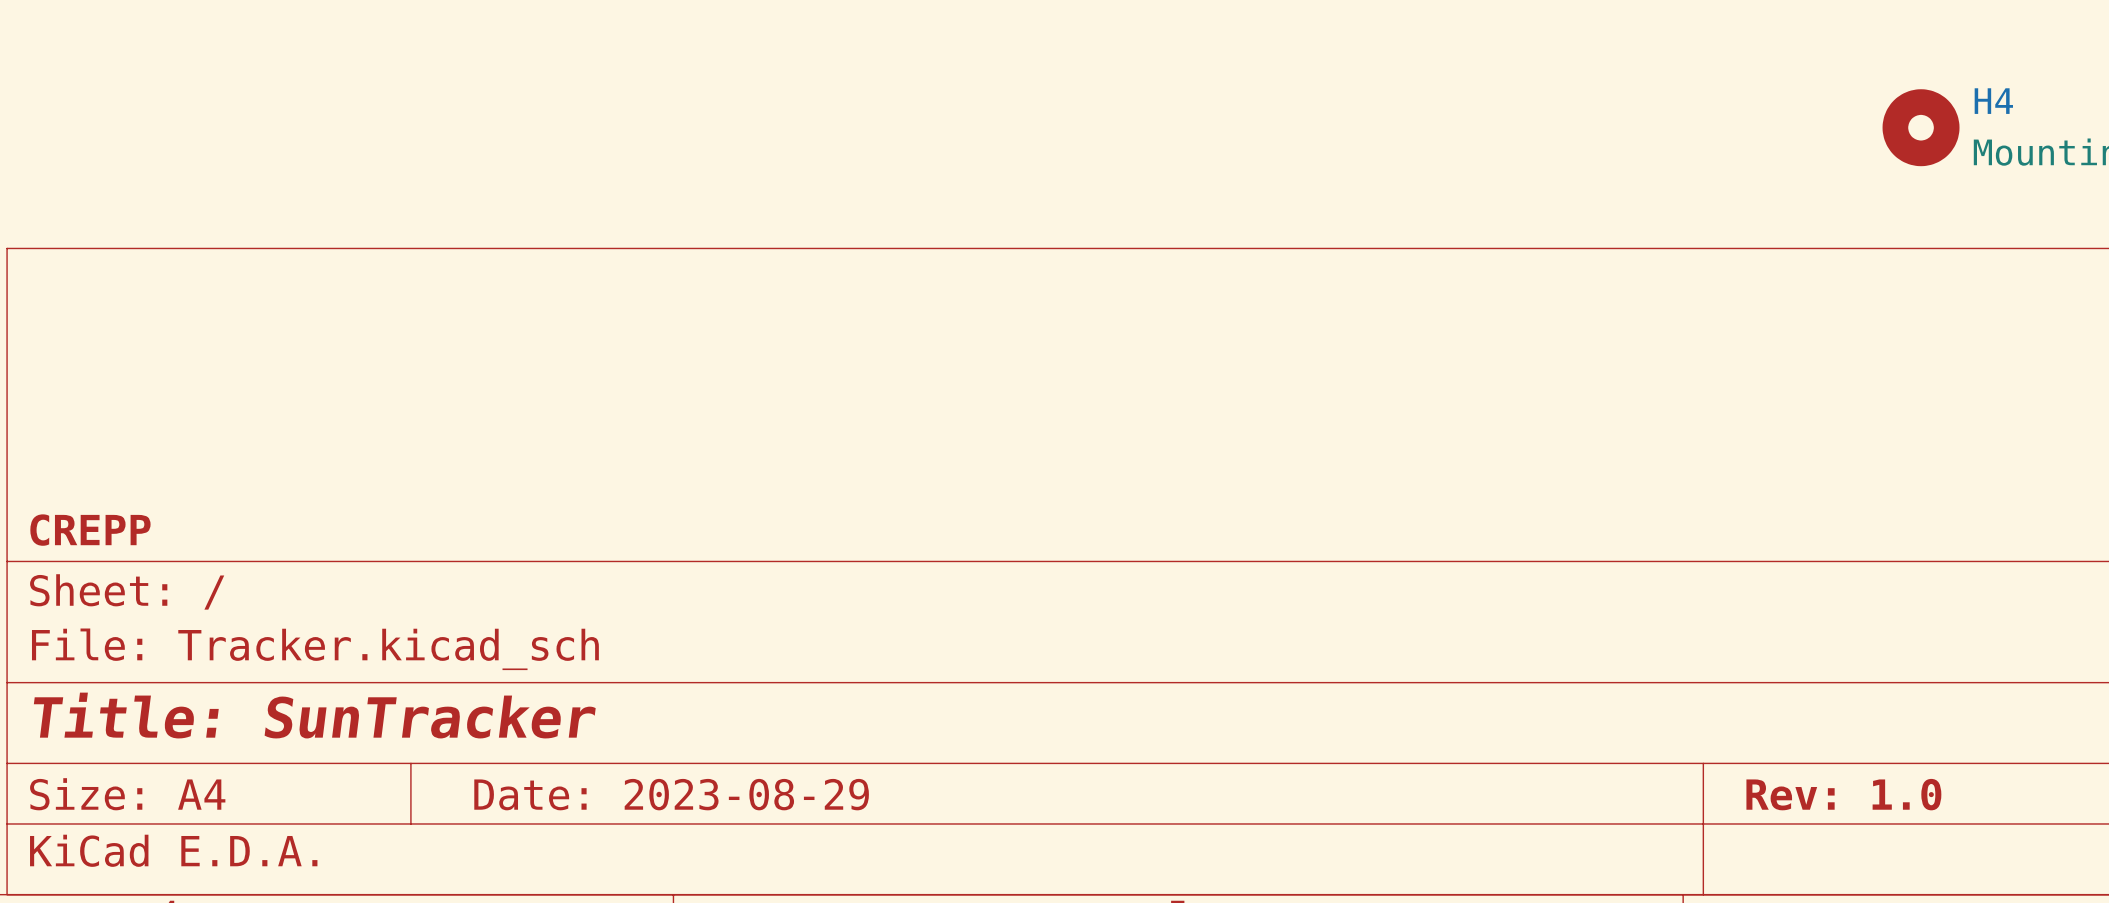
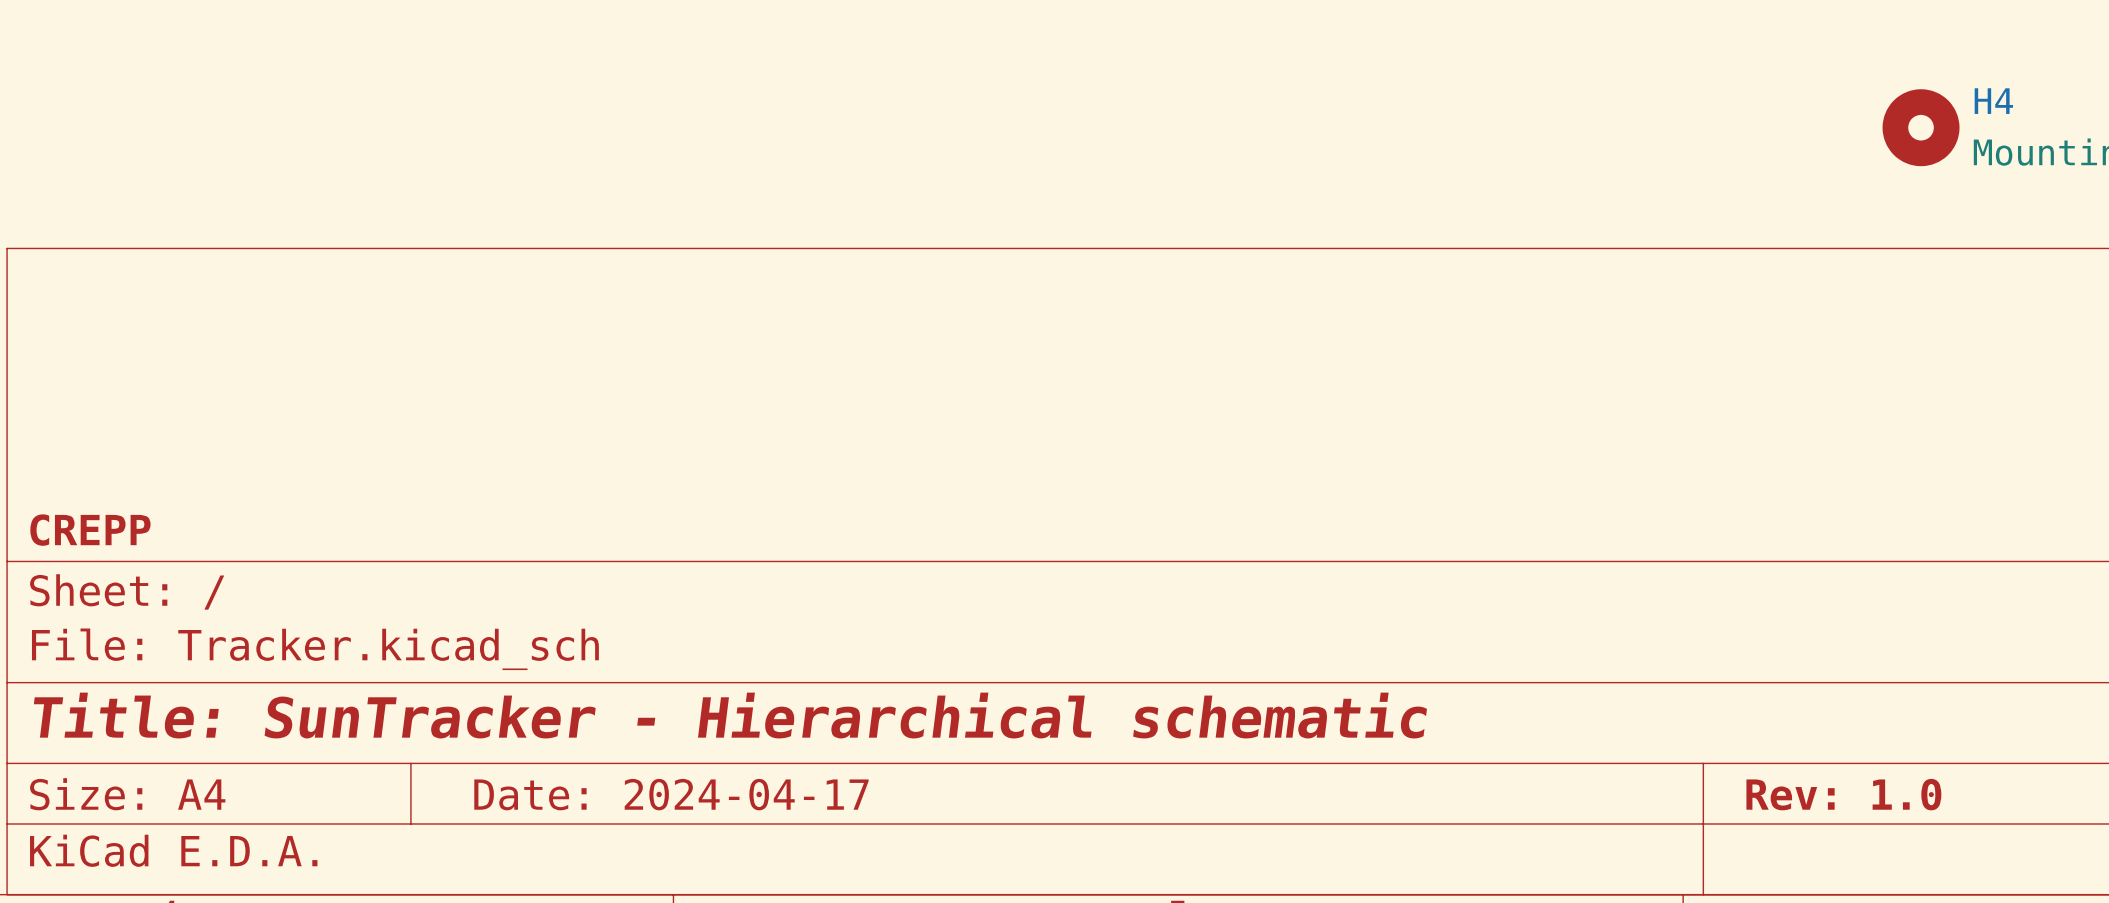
title block: Title: SunTracker (314, 715) -> Title: SunTracker - Hierarchical schematic (730, 715)
title block: Date: 2023-08-29 (671, 794) -> Date: 2024-04-17 (671, 794)

